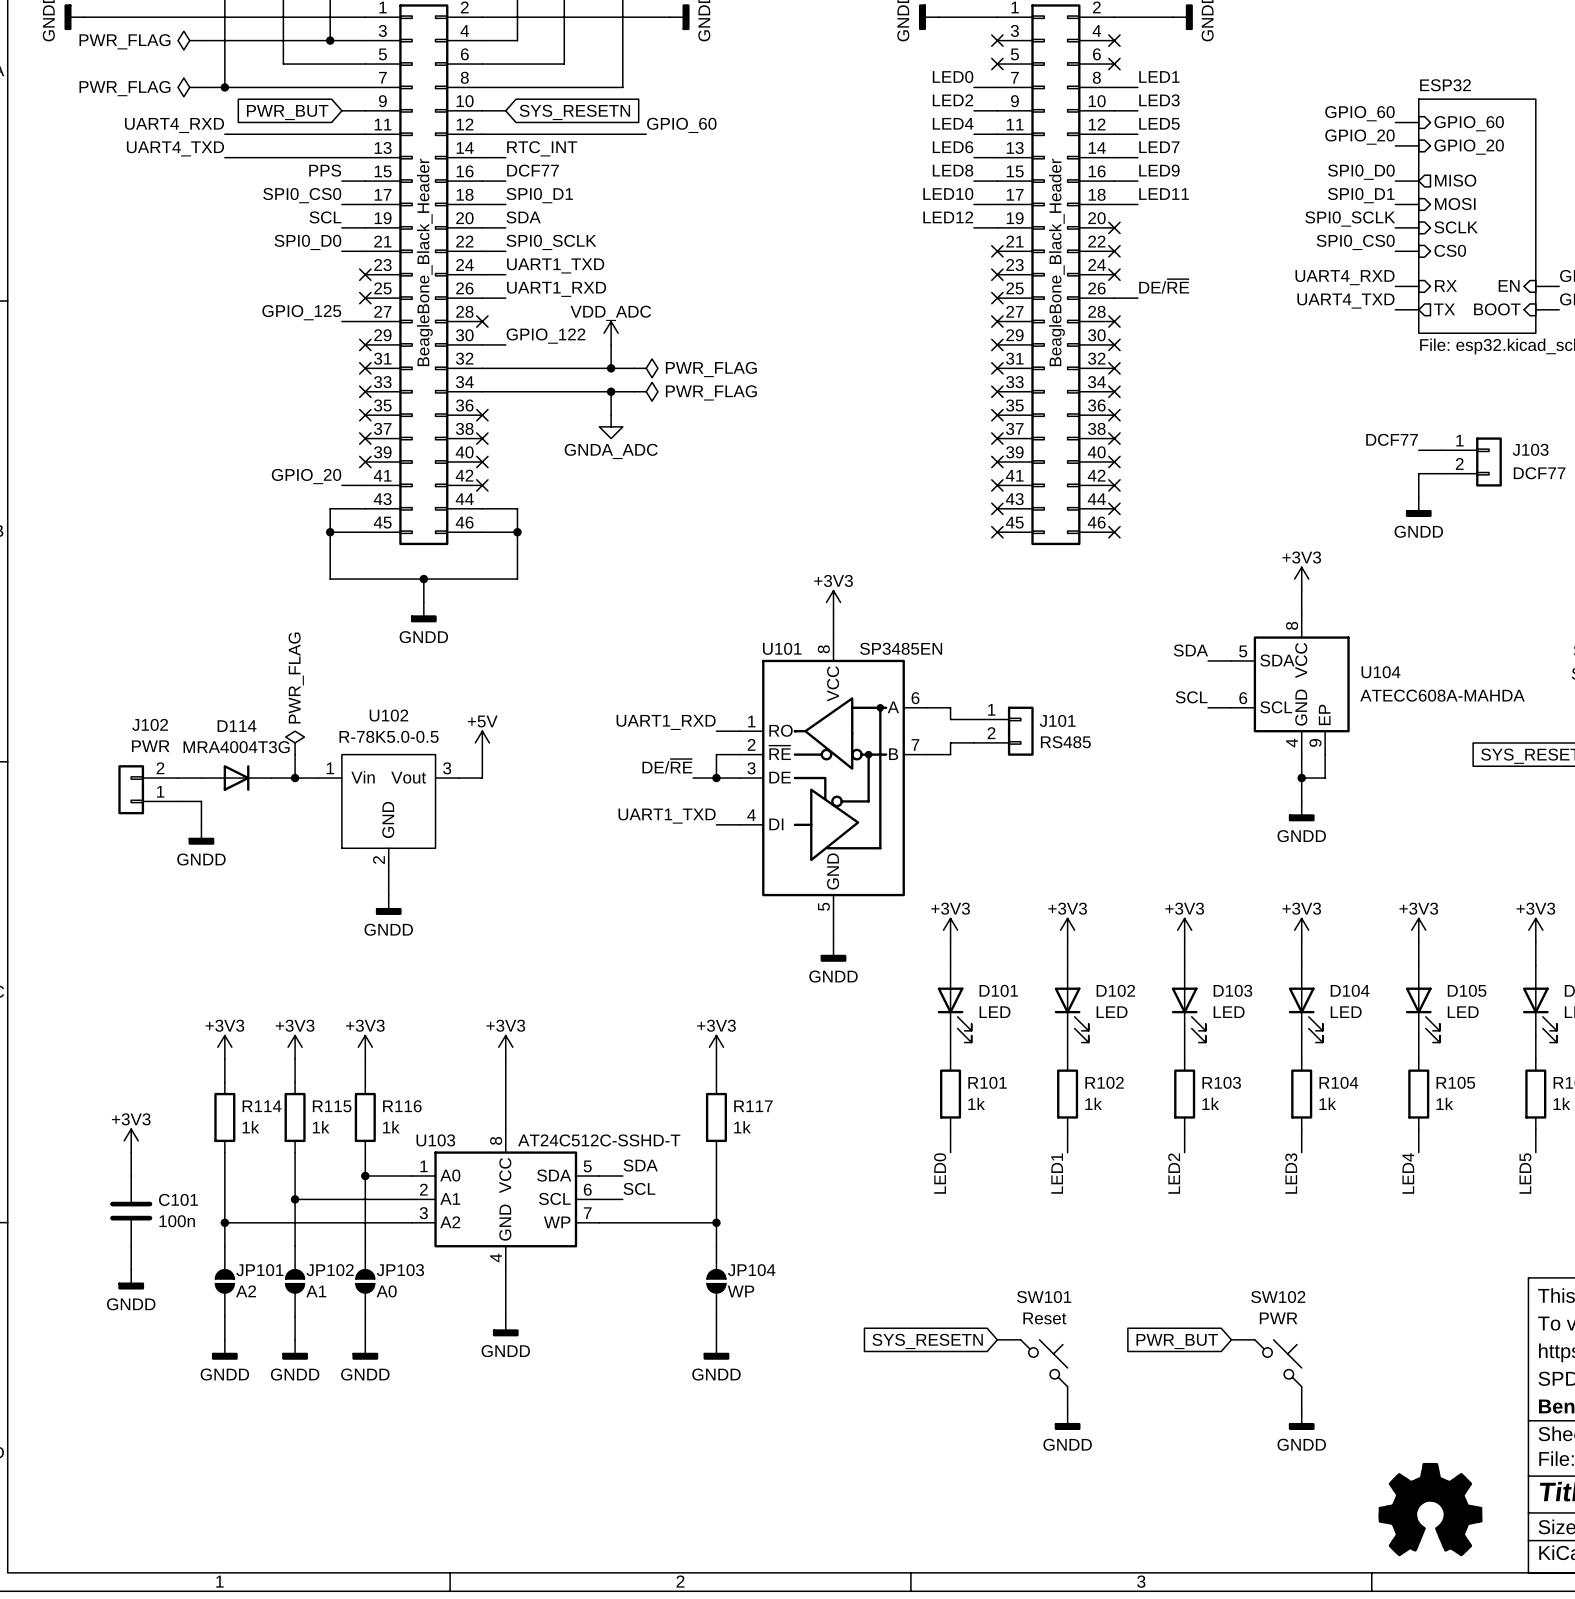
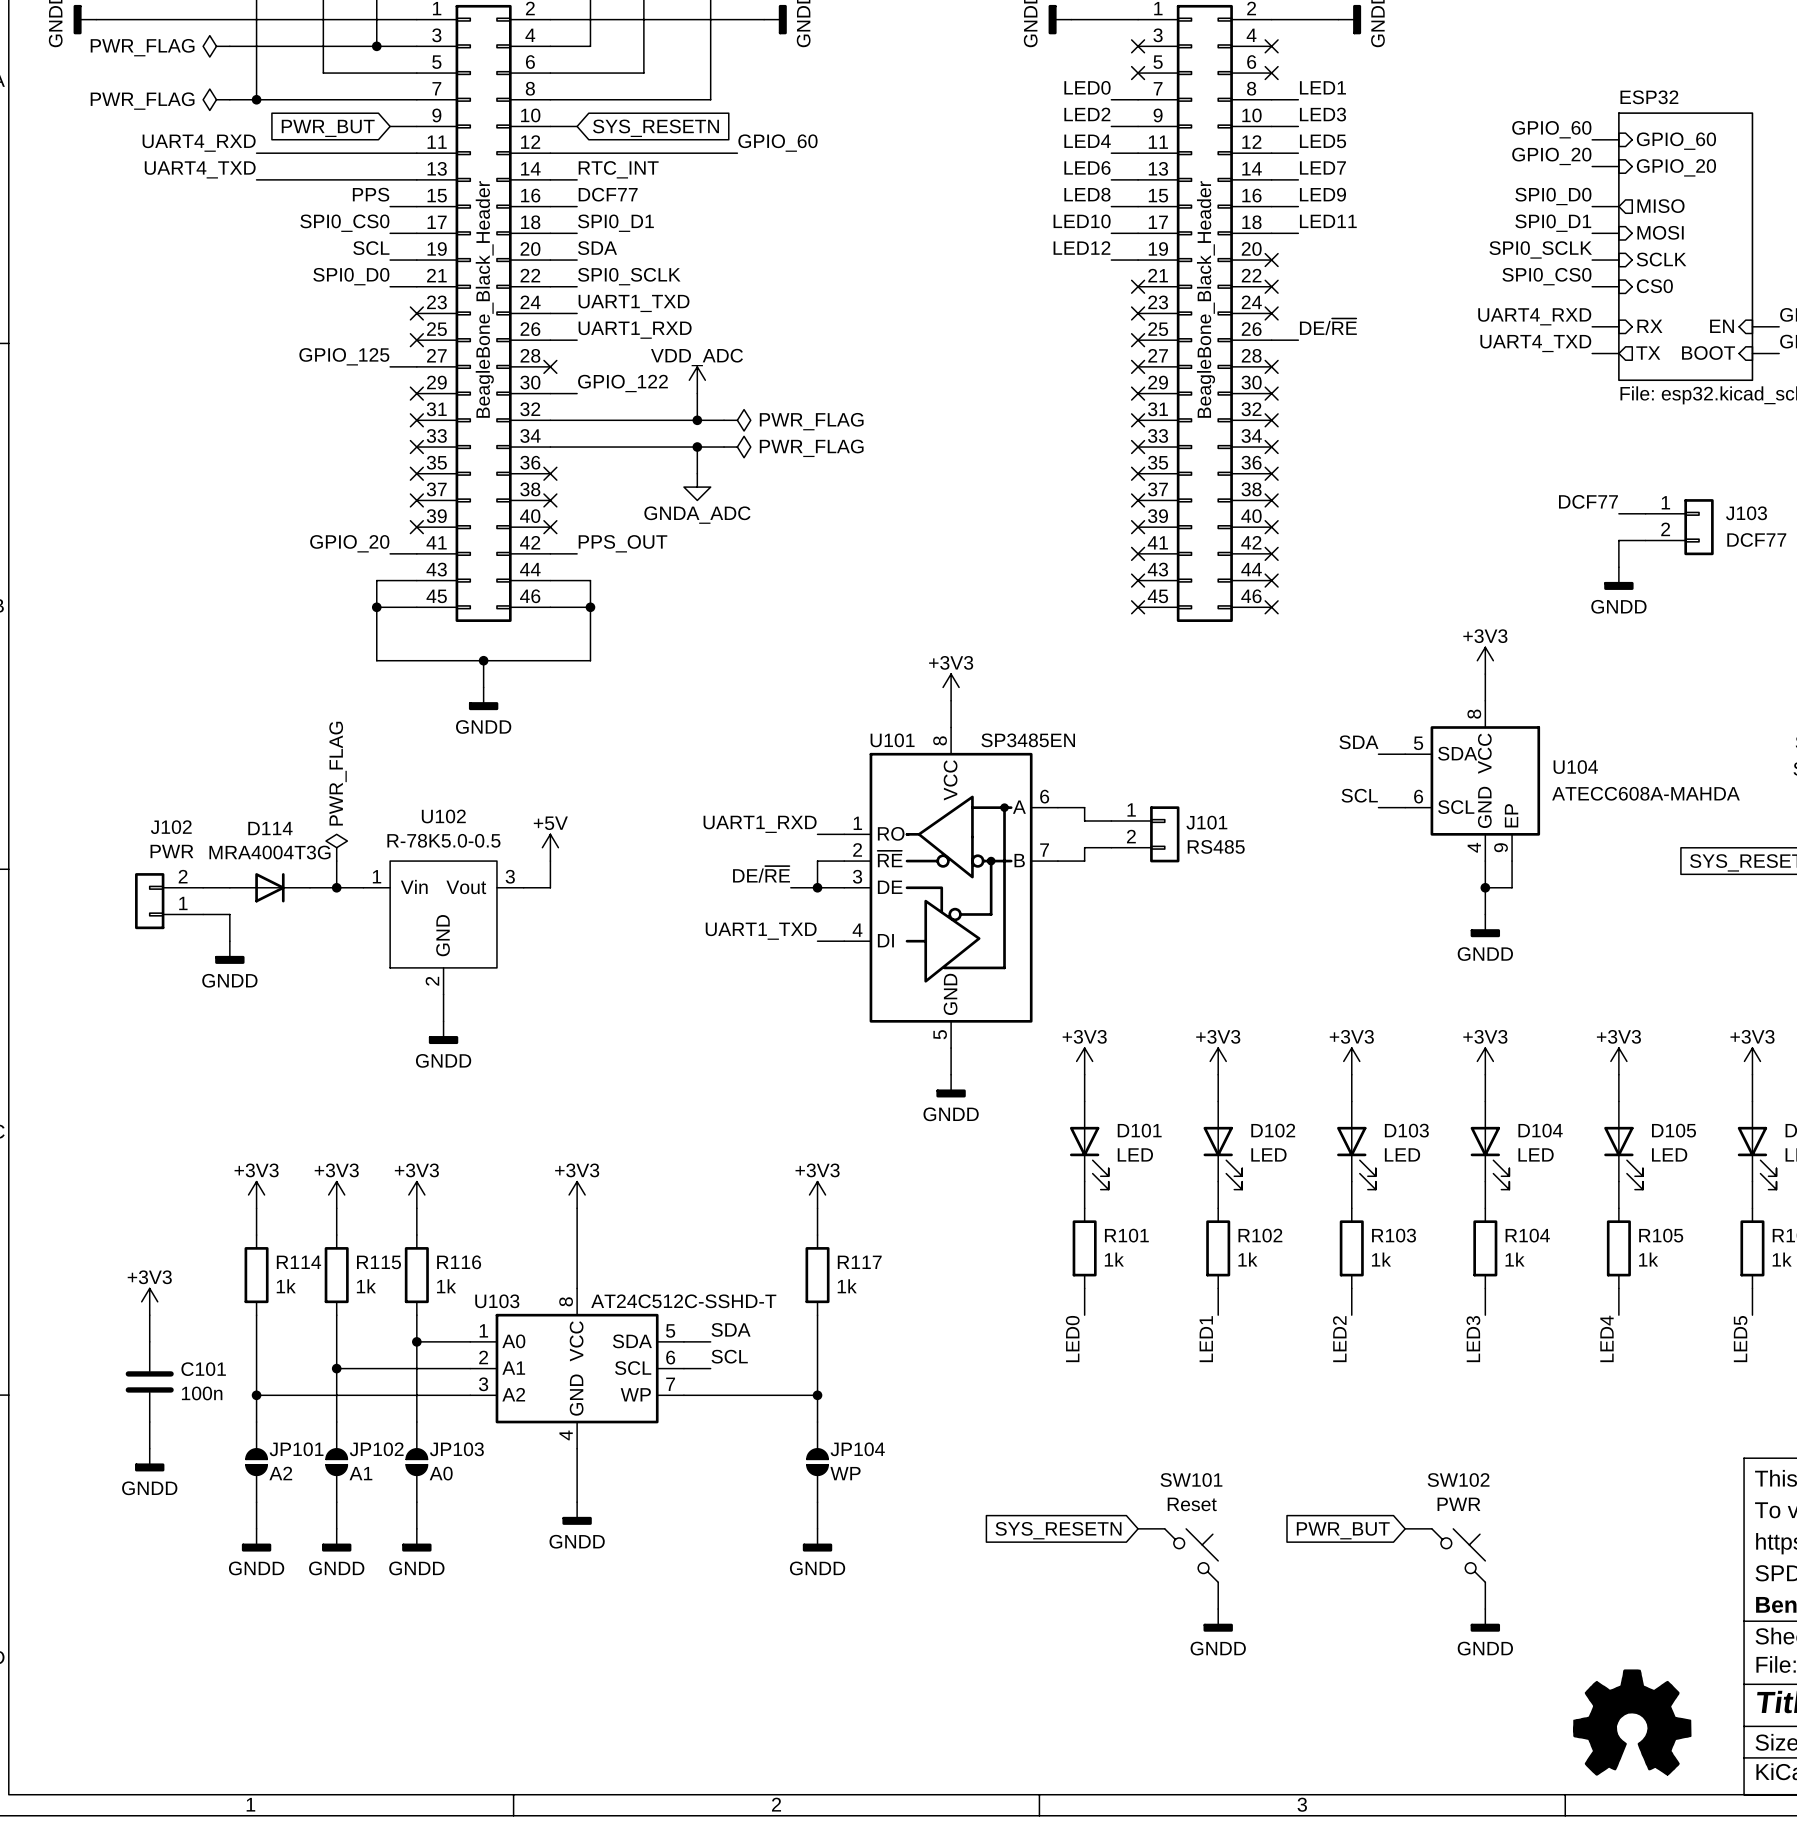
label: none -> PPS_OUT (623, 543)
wire: none -> (550, 553) (577, 553)
no-connect mark: (482, 485) -> none

